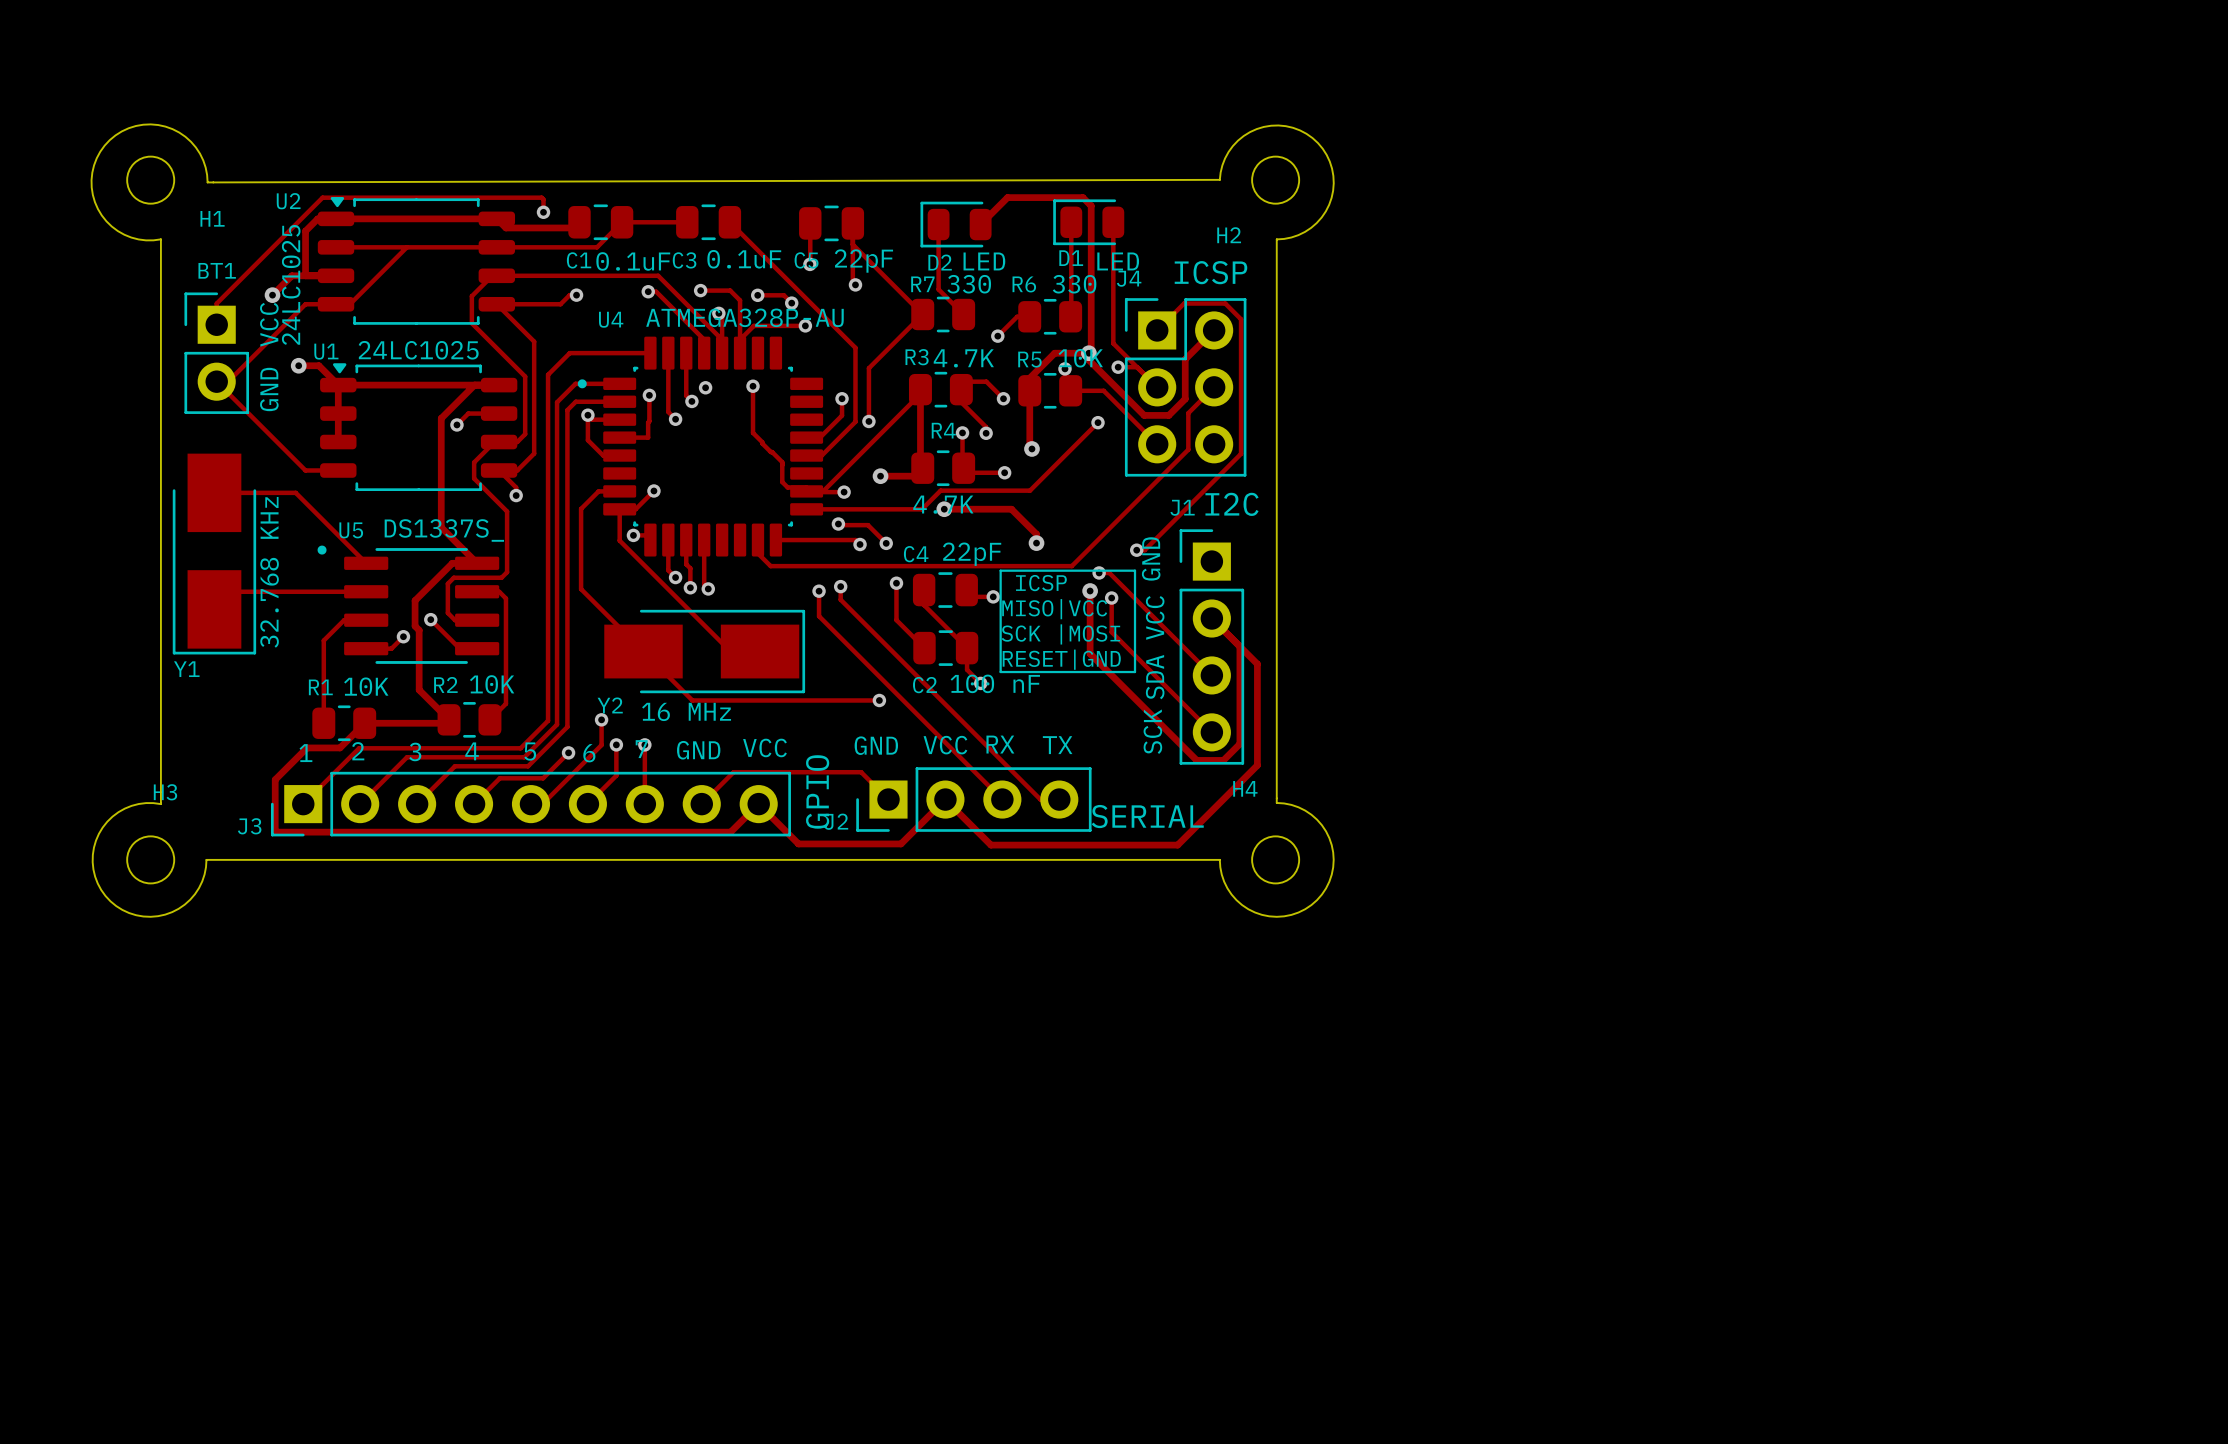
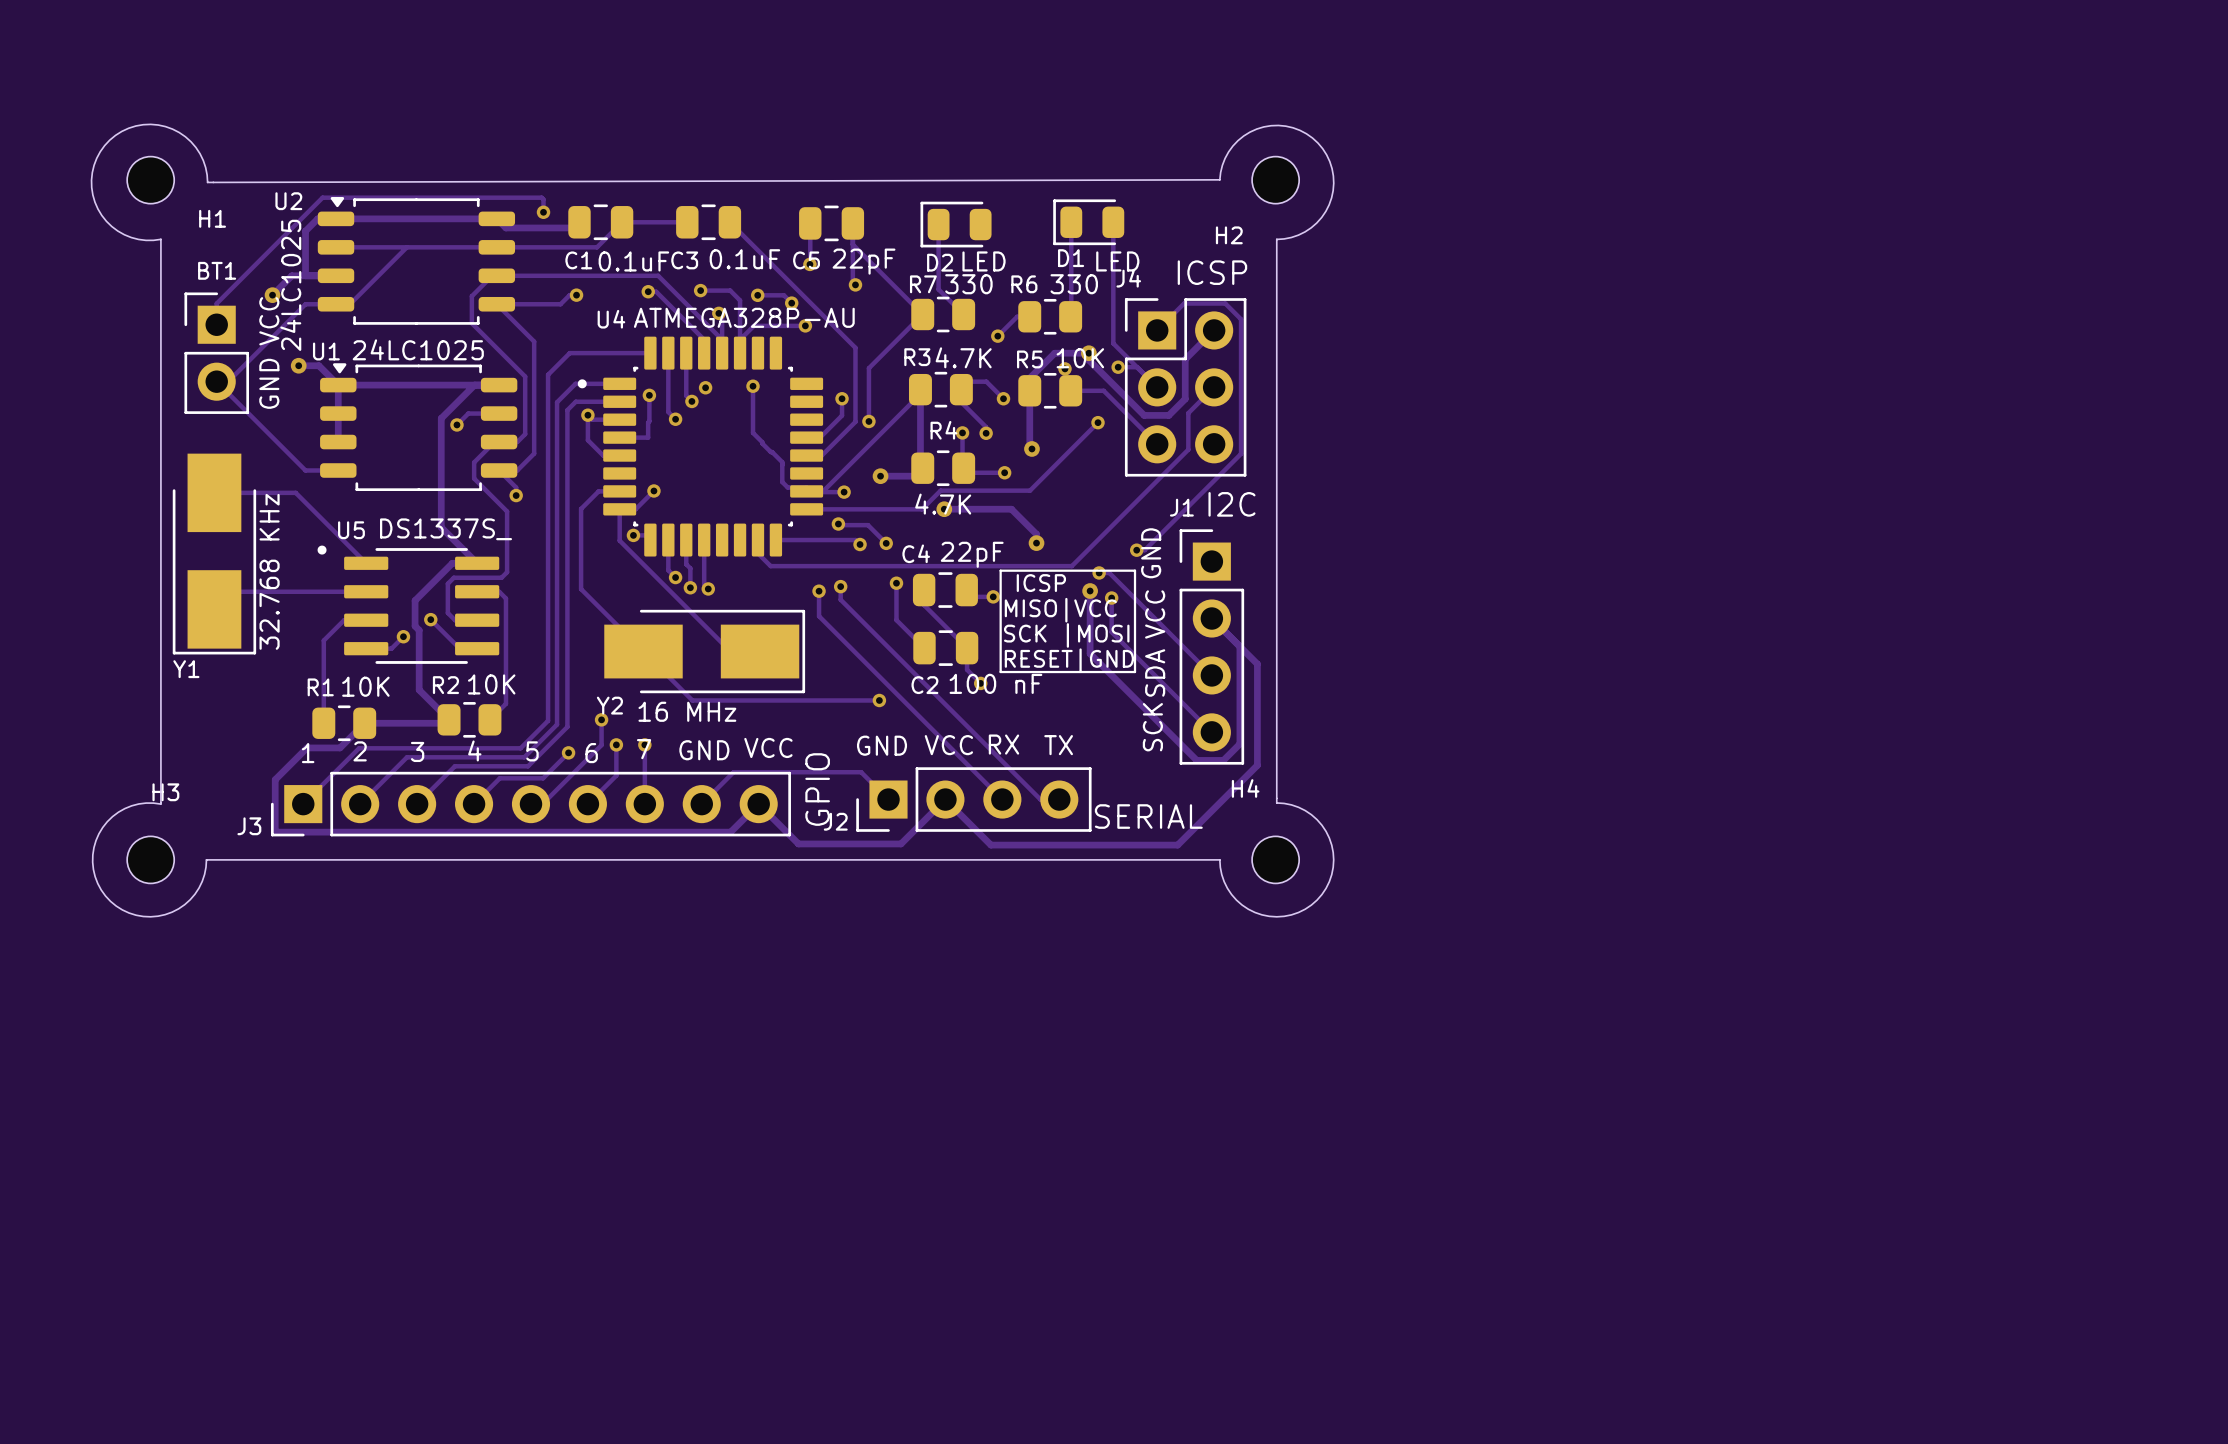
track: (980, 224) (1007, 197) (1082, 197) (1091, 205) (1091, 350) (1088, 353) -> none

